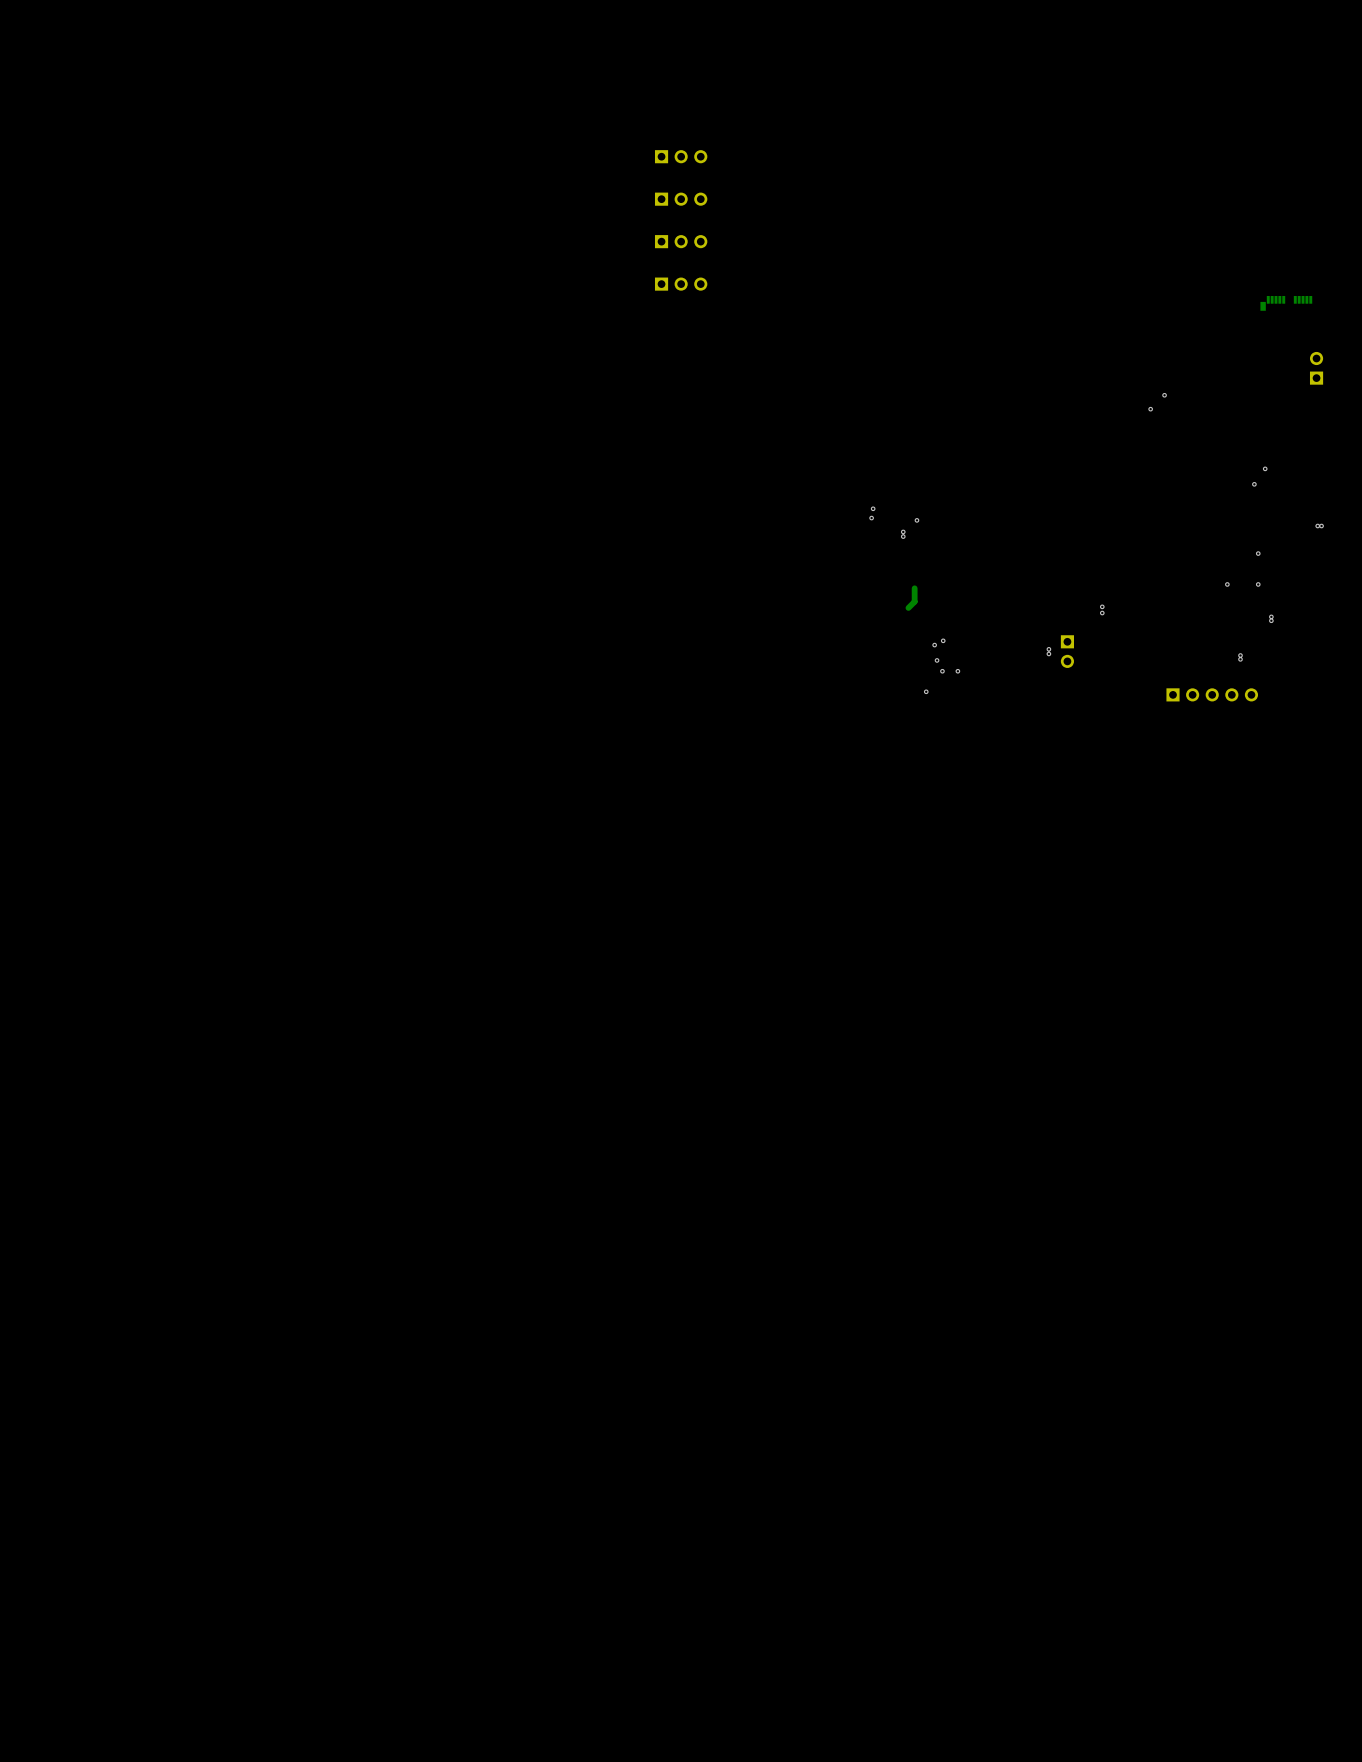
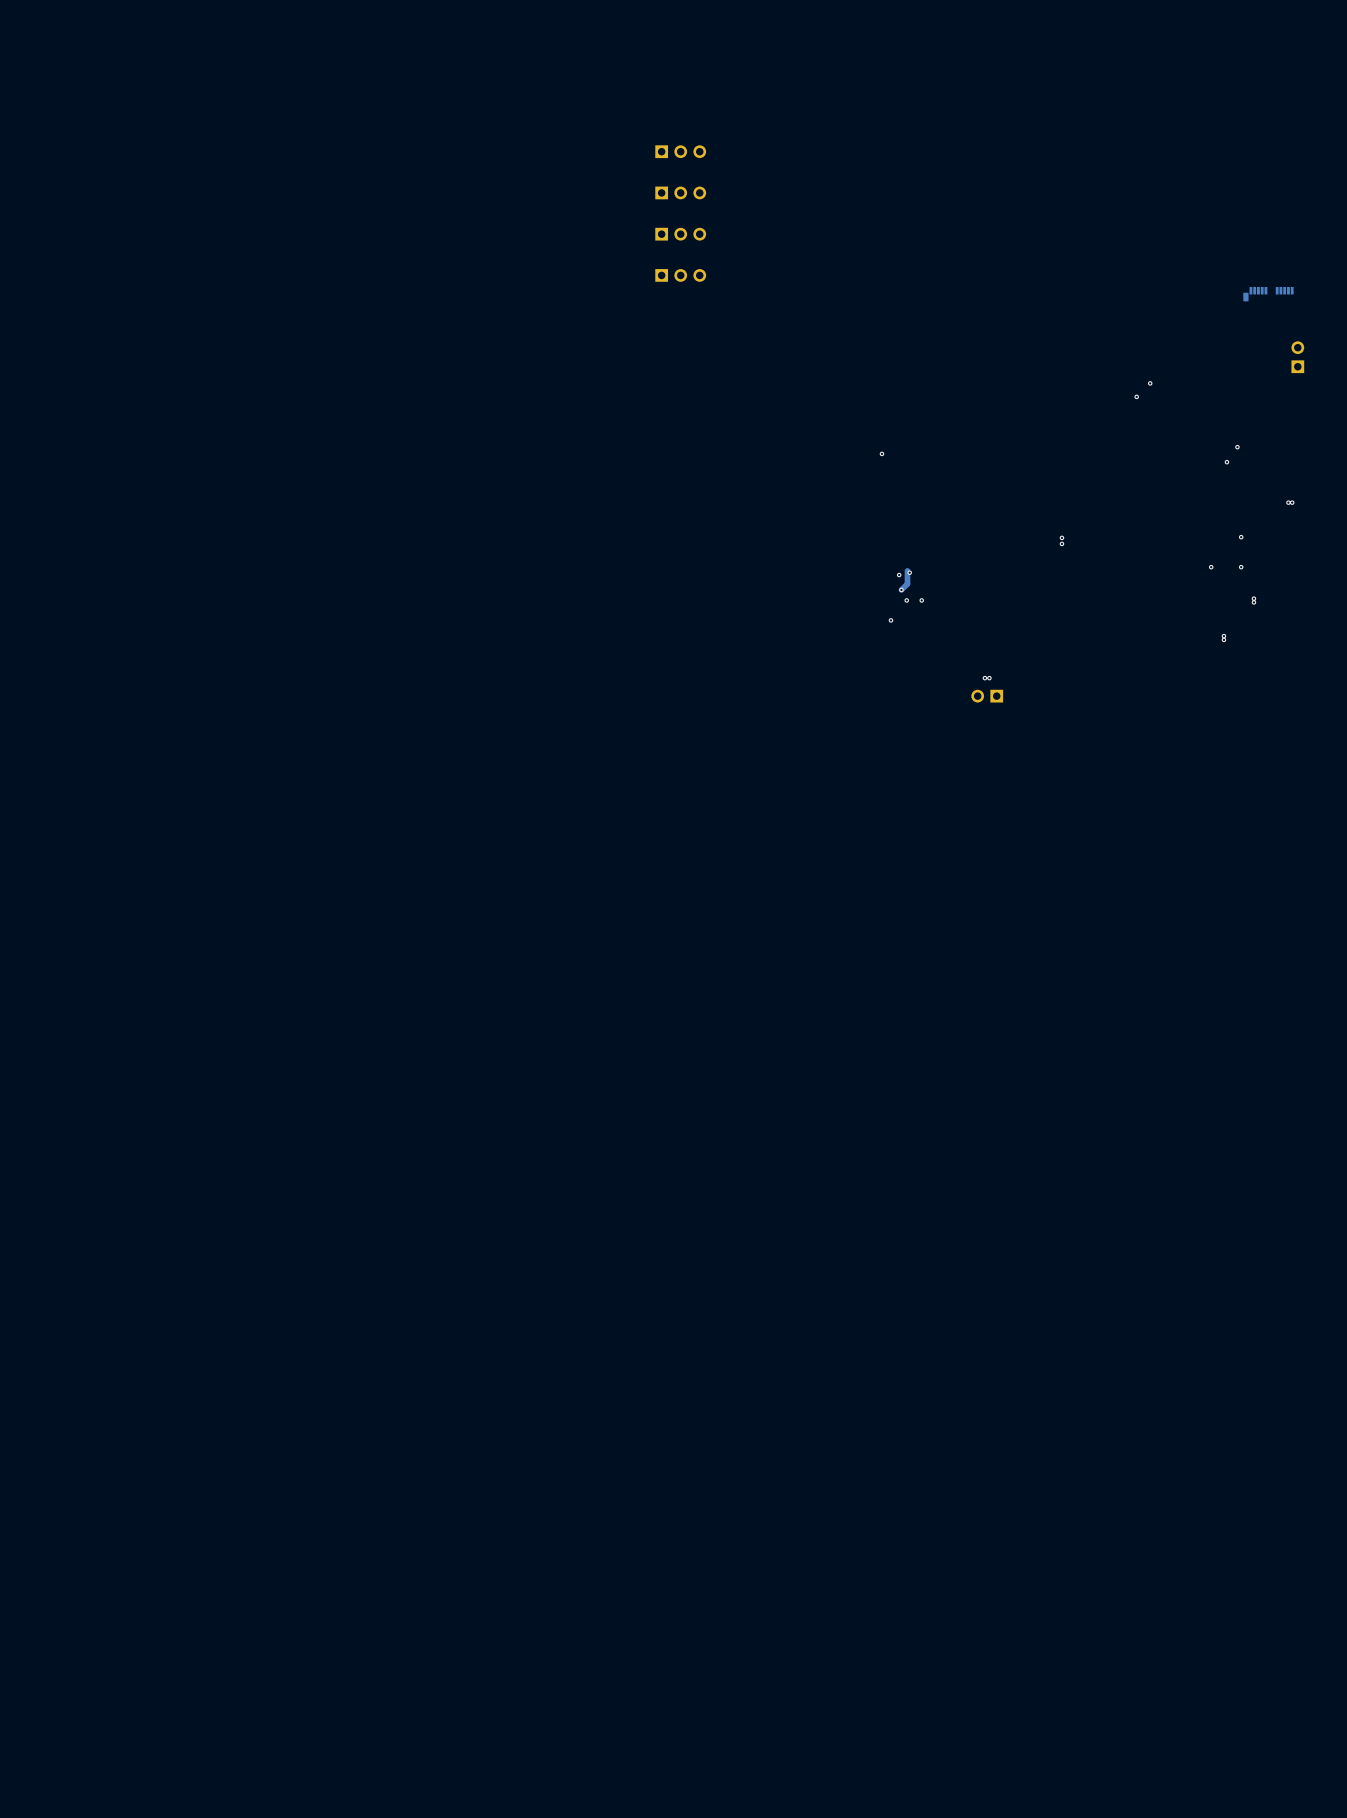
via: none -> (1237, 447)
via: none -> (881, 453)
via: (1265, 468) -> none
via: none -> (1226, 462)
via: (1254, 484) -> none
via: (873, 508) -> none
via: (871, 518) -> none
via: none -> (1288, 502)
via: none -> (1292, 502)
via: (916, 520) -> none
via: (1317, 526) -> none
via: (1321, 526) -> none
via: (903, 531) -> none
via: (903, 536) -> none
via: none -> (1061, 537)
via: none -> (1061, 543)
via: none -> (909, 572)
via: none -> (899, 575)
via: (1102, 606) -> none
via: none -> (901, 589)
via: (1102, 613) -> none
via: none -> (906, 600)
via: none -> (921, 600)
via: none -> (890, 620)
via: (943, 640) -> none
via: (934, 645) -> none
via: (1048, 649) -> none
part rotation: 0° (1067, 651) -> 90° clockwise (987, 696)
part position: (1067, 651) -> (987, 696)
via: (1048, 653) -> none
via: (937, 660) -> none
via: (942, 671) -> none
via: (957, 671) -> none
via: (926, 691) -> none
part: (1212, 694) -> none
via: none -> (984, 678)
via: none -> (989, 678)

